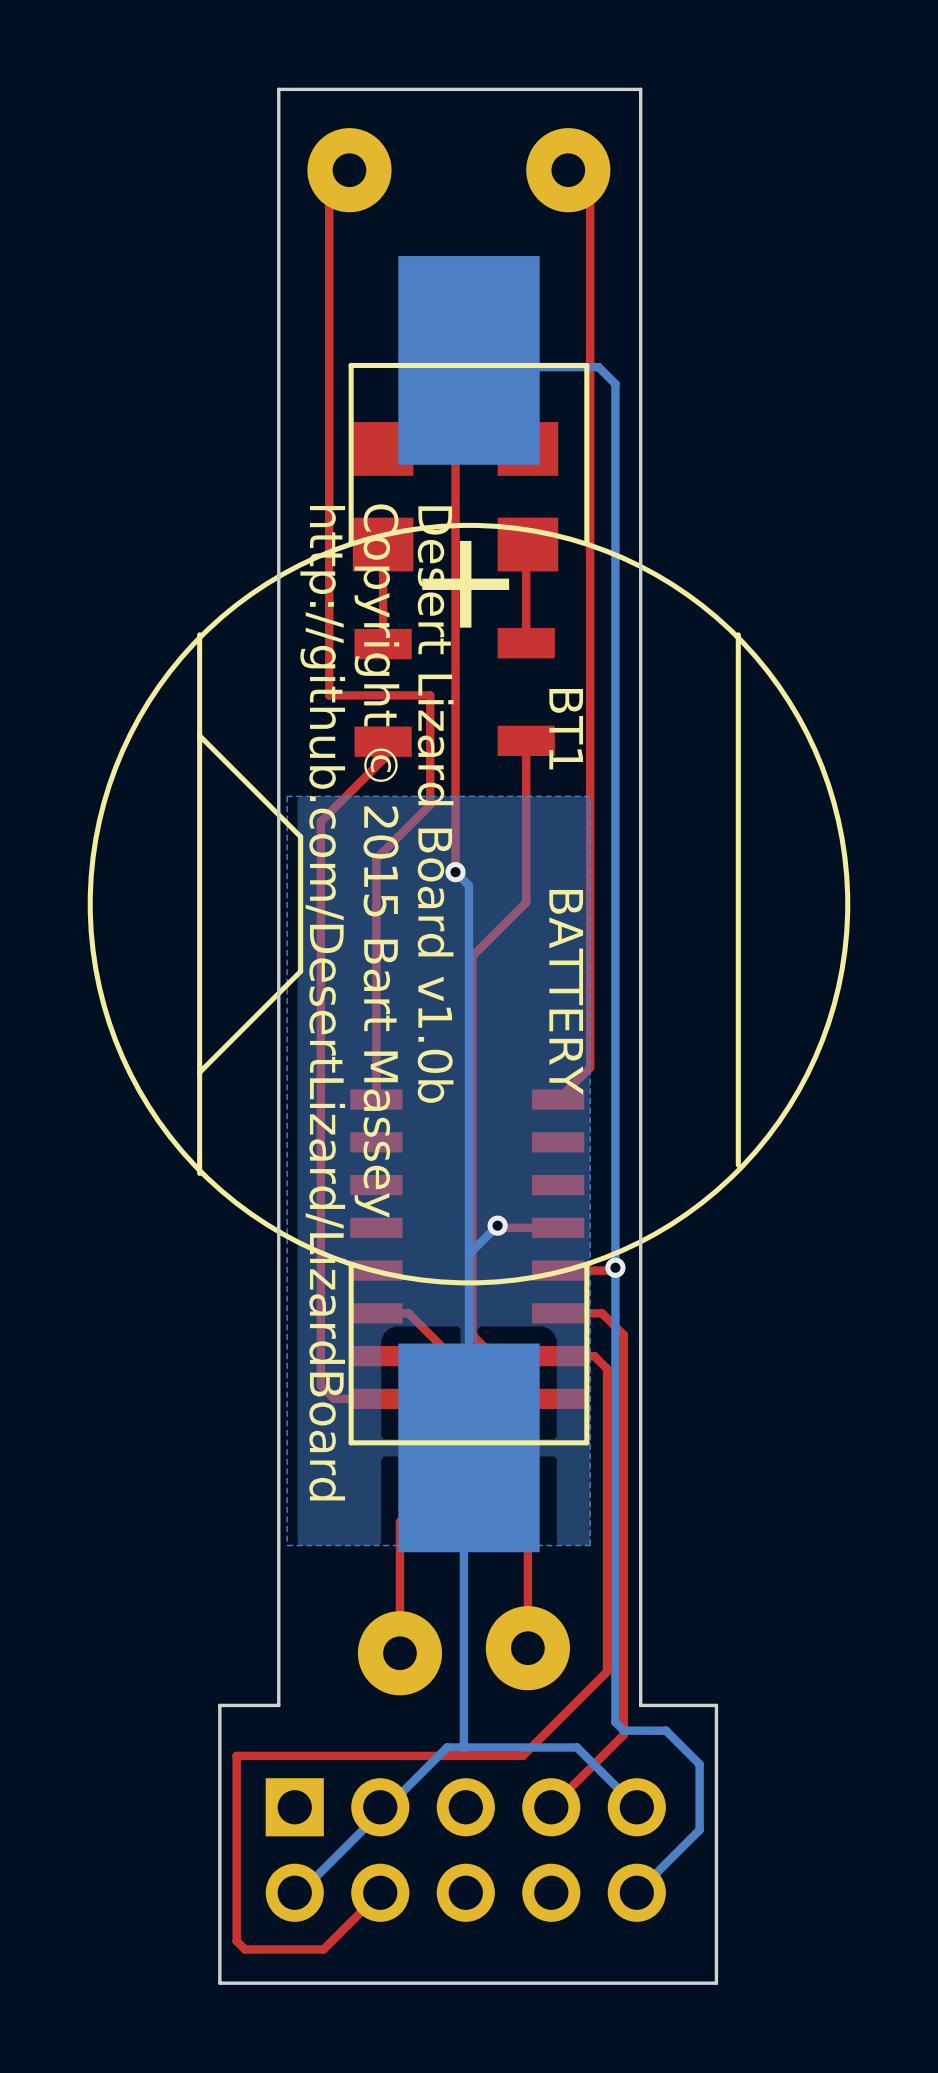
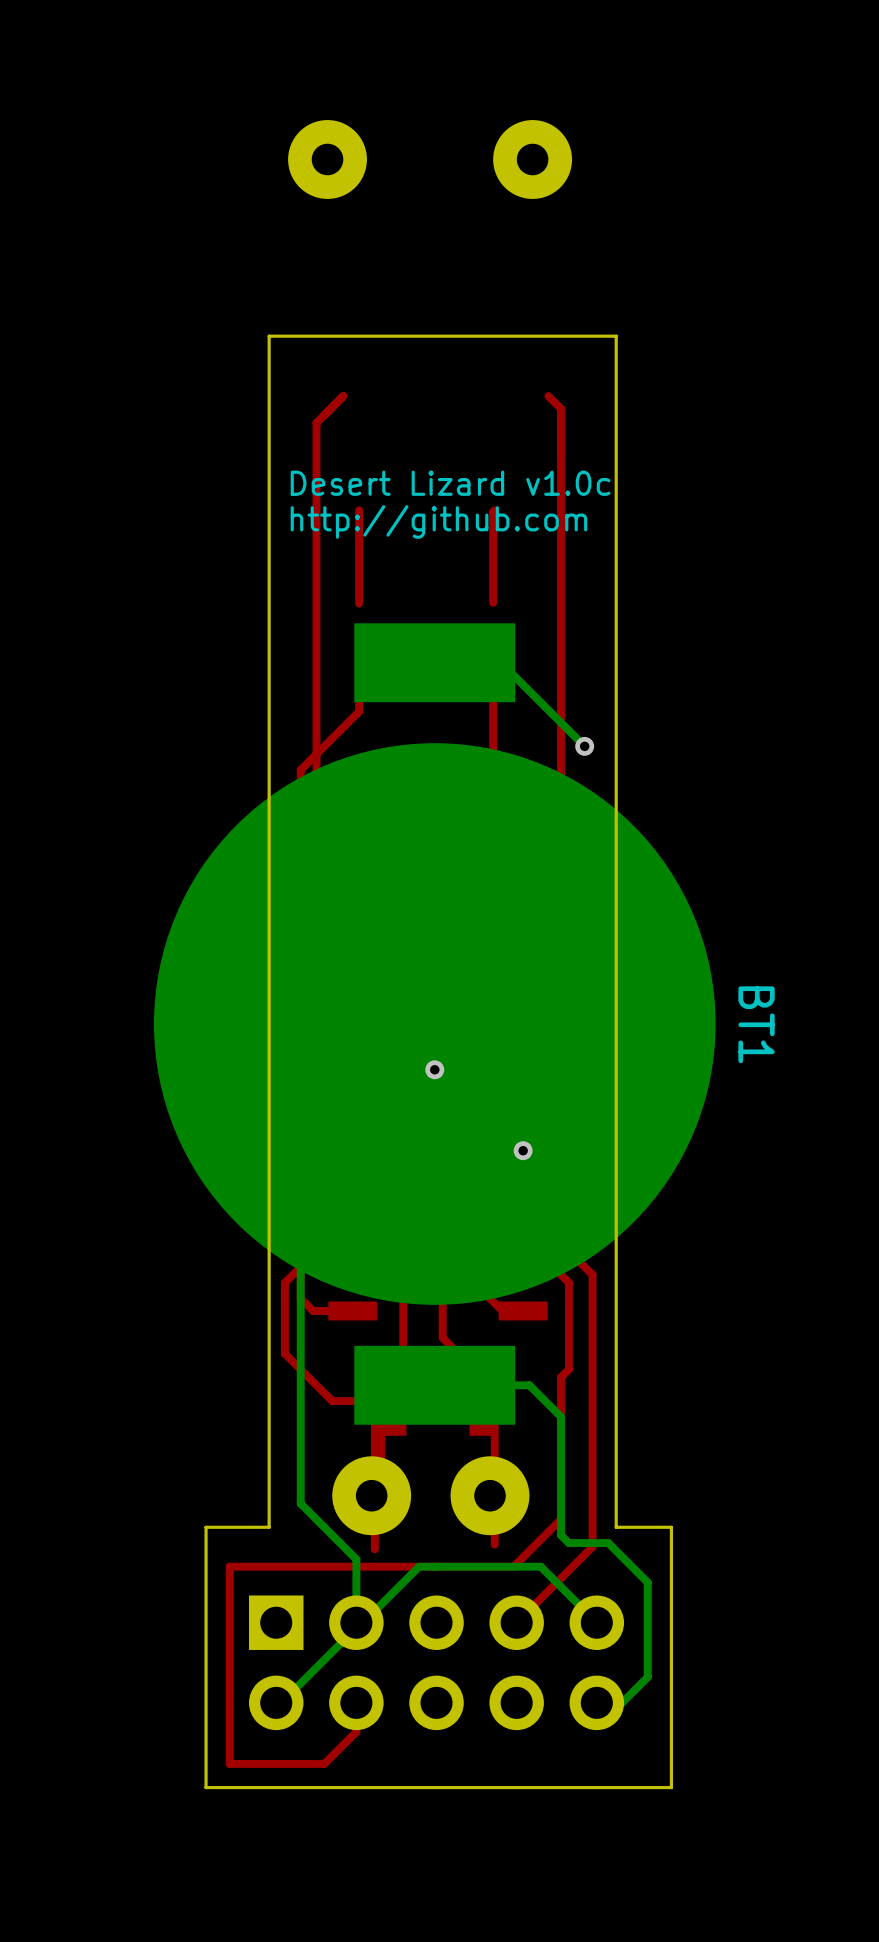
top track: (349, 170) (329, 190) (329, 695) (430, 695) (430, 804) (376, 858) (376, 1099) -> (343, 396) (316, 422) (316, 994) (352, 1030)
top track: (568, 170) (590, 192) (590, 1067) -> (548, 396) (561, 408) (561, 992) (553, 1000)
BT1 footprint: [87, 256, 851, 1553] -> [153, 623, 716, 1425]
bottom track: (468, 360) (475, 367) (598, 367) (615, 383) (615, 1722) (623, 1730) (665, 1730) (699, 1764) (699, 1829) (636, 1892) -> none
top track: (455, 448) (455, 872) -> none
part: (383, 496) -> none
part: (527, 496) -> none
text: none -> http://github.com (438, 521)
part: (383, 692) -> none
part: (526, 692) -> none
bottom track: none -> (434, 662) (501, 662) (584, 746)
BT1 name position: BT1 (566, 729) -> BT1 (756, 1024)
bottom zone outline: (590, 796) (590, 1545) (287, 1545) (287, 796) (590, 796) -> none
via: none -> (584, 746)
text: Desert Lizard Board v1.0b (435, 804) -> none
text: Copyright © 2015 Bart Massey (376, 860) -> none
bottom track: (455, 872) (468, 885) (468, 1447) (463, 1452) (463, 1747) -> none
via: (455, 872) -> none
BT1 value: BATTERY (566, 992) -> none
text: http://github.com/DesertLizard/LizardBoard (322, 1003) -> Desert Lizard v1.0c (450, 483)
via: none -> (434, 1069)
bottom track: none -> (300, 1087) (300, 1503) (356, 1559) (356, 1627) (276, 1707) (276, 1702)
bottom track: (497, 1225) (468, 1254) -> none
via: (497, 1225) -> none
via: none -> (523, 1150)
via: (615, 1267) -> none
top track: none -> (336, 1230) (284, 1282) (284, 1353) (332, 1401) (381, 1401) (381, 1486) (371, 1495)
top track: (585, 1313) (602, 1313) (623, 1335) (623, 1734) (551, 1807) -> (548, 1230) (592, 1274) (592, 1546) (516, 1622)
top track: (607, 1461) (607, 1671) (522, 1755) (236, 1755) (236, 1941) (245, 1949) (323, 1949) (380, 1892) (380, 1915) -> (568, 1369) (561, 1377) (561, 1519) (513, 1566) (229, 1566) (229, 1763) (324, 1763) (356, 1731) (356, 1702)
bottom track: none -> (434, 1385) (529, 1385) (561, 1416) (561, 1535) (568, 1543) (608, 1543) (647, 1582) (647, 1677) (622, 1702) (596, 1702)
part position: (527, 1648) -> (490, 1495)
part position: (399, 1653) -> (371, 1495)
board edge: (716, 1705) (640, 1705) (640, 89) (278, 89) (278, 1705) (219, 1705) -> (671, 1598) (671, 1527) (616, 1527) (616, 336) (269, 336) (269, 1527) (206, 1527) (206, 1598)
bottom track: none -> (596, 1622) (540, 1566) (419, 1566) (363, 1622) (356, 1622)
bottom track: (636, 1807) (577, 1747) (447, 1747) (387, 1807) (380, 1807) (380, 1812) (294, 1898) (294, 1892) -> none
part position: (465, 1850) -> (436, 1662)
board edge: (716, 1907) (716, 1983) (219, 1983) (219, 1907) -> (671, 1787) (206, 1787)

